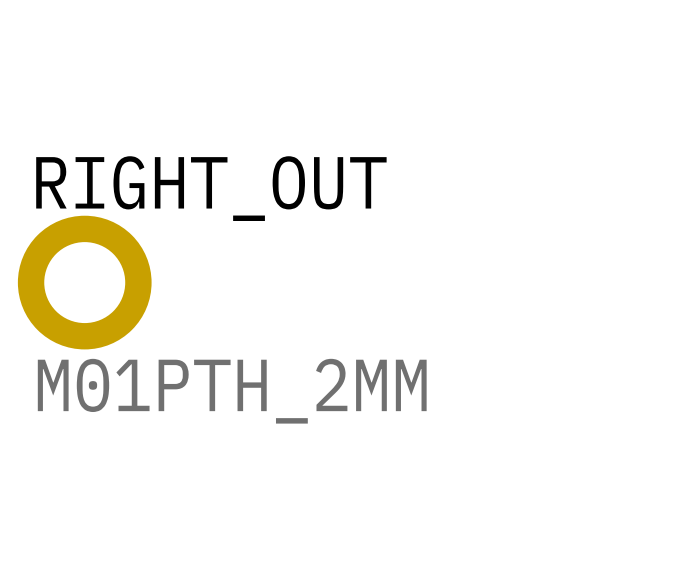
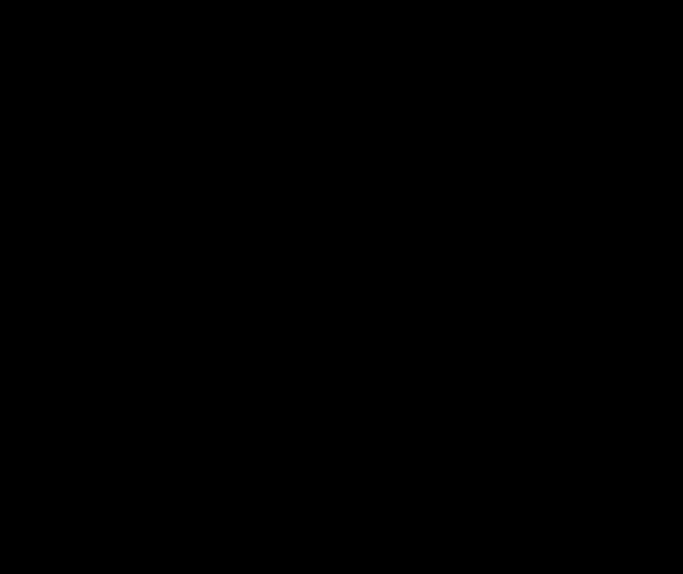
RIGHT_OUT: M01PTH_2MM (84, 282) -> none

